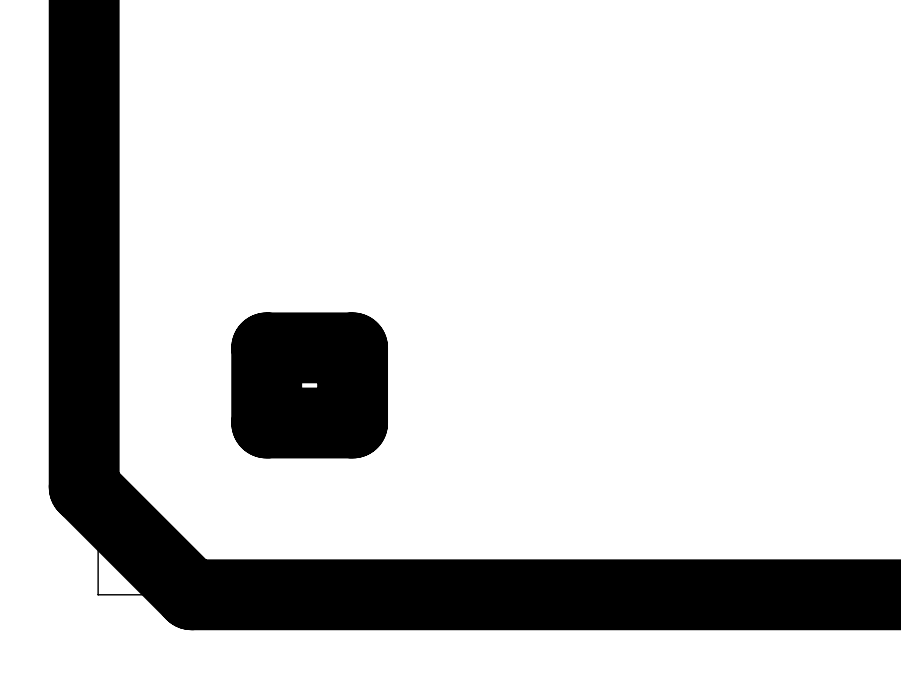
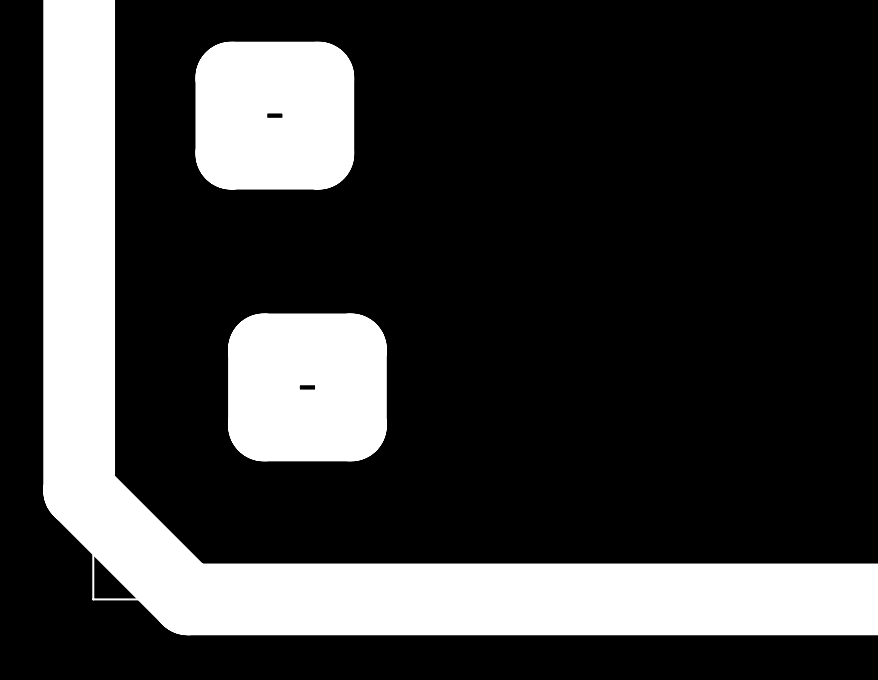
board edge: none -> (318, 77) (231, 77) (231, 153) (318, 153) (318, 77)

